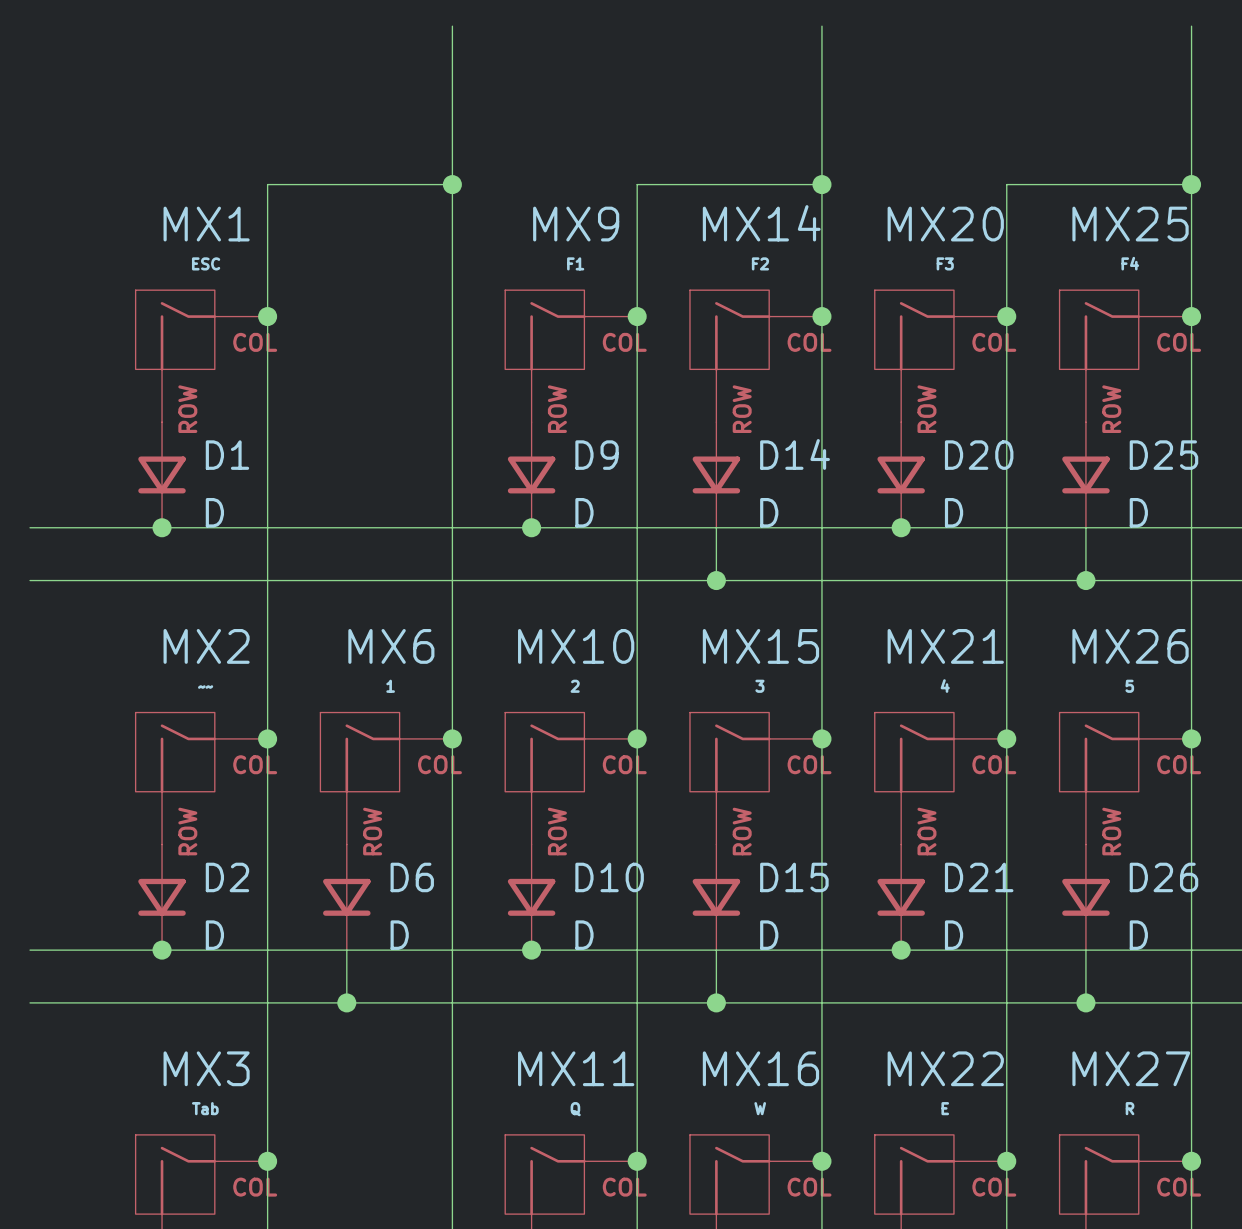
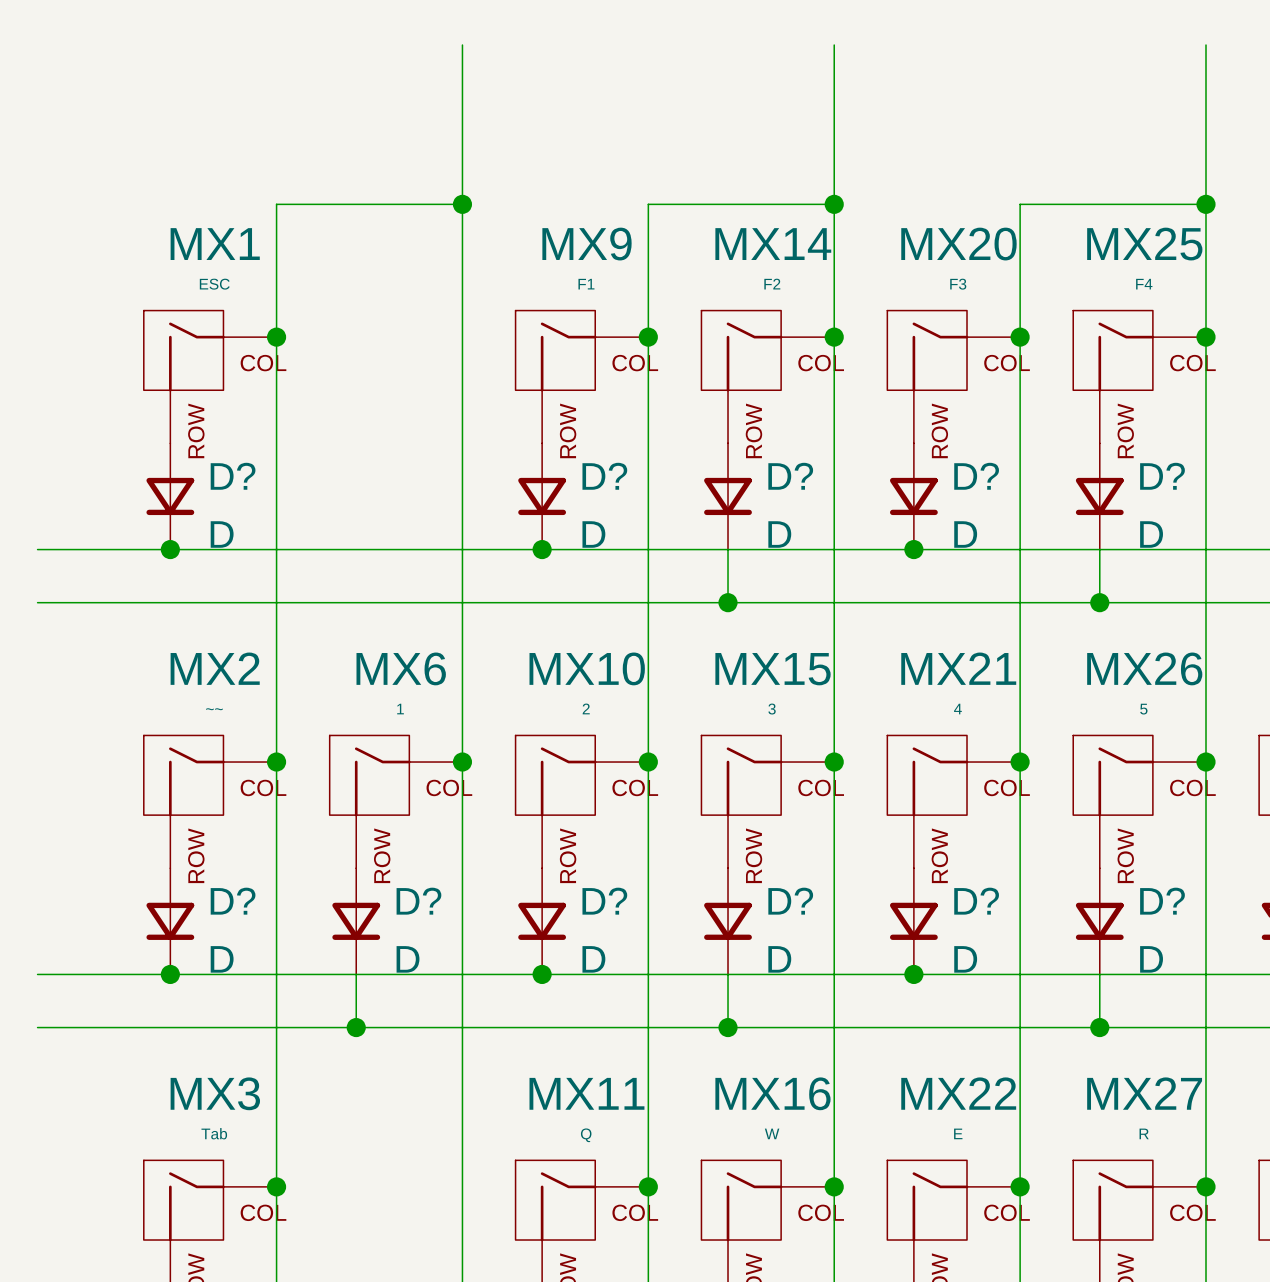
D14 name: D14 (795, 454) -> D? (790, 476)
D1 name: D1 (227, 455) -> D? (233, 476)
D9 name: D9 (597, 455) -> D? (604, 476)
D20 name: D20 (979, 455) -> D? (976, 476)
D25 name: D25 (1163, 455) -> D? (1162, 476)
D2 name: D2 (227, 877) -> D? (233, 901)
D6 name: D6 (412, 877) -> D? (418, 901)
D10 name: D10 (609, 877) -> D? (604, 901)
D15 name: D15 (794, 877) -> D? (790, 901)
D21 name: D21 (979, 877) -> D? (976, 901)
D26 name: D26 (1163, 877) -> D? (1162, 901)

